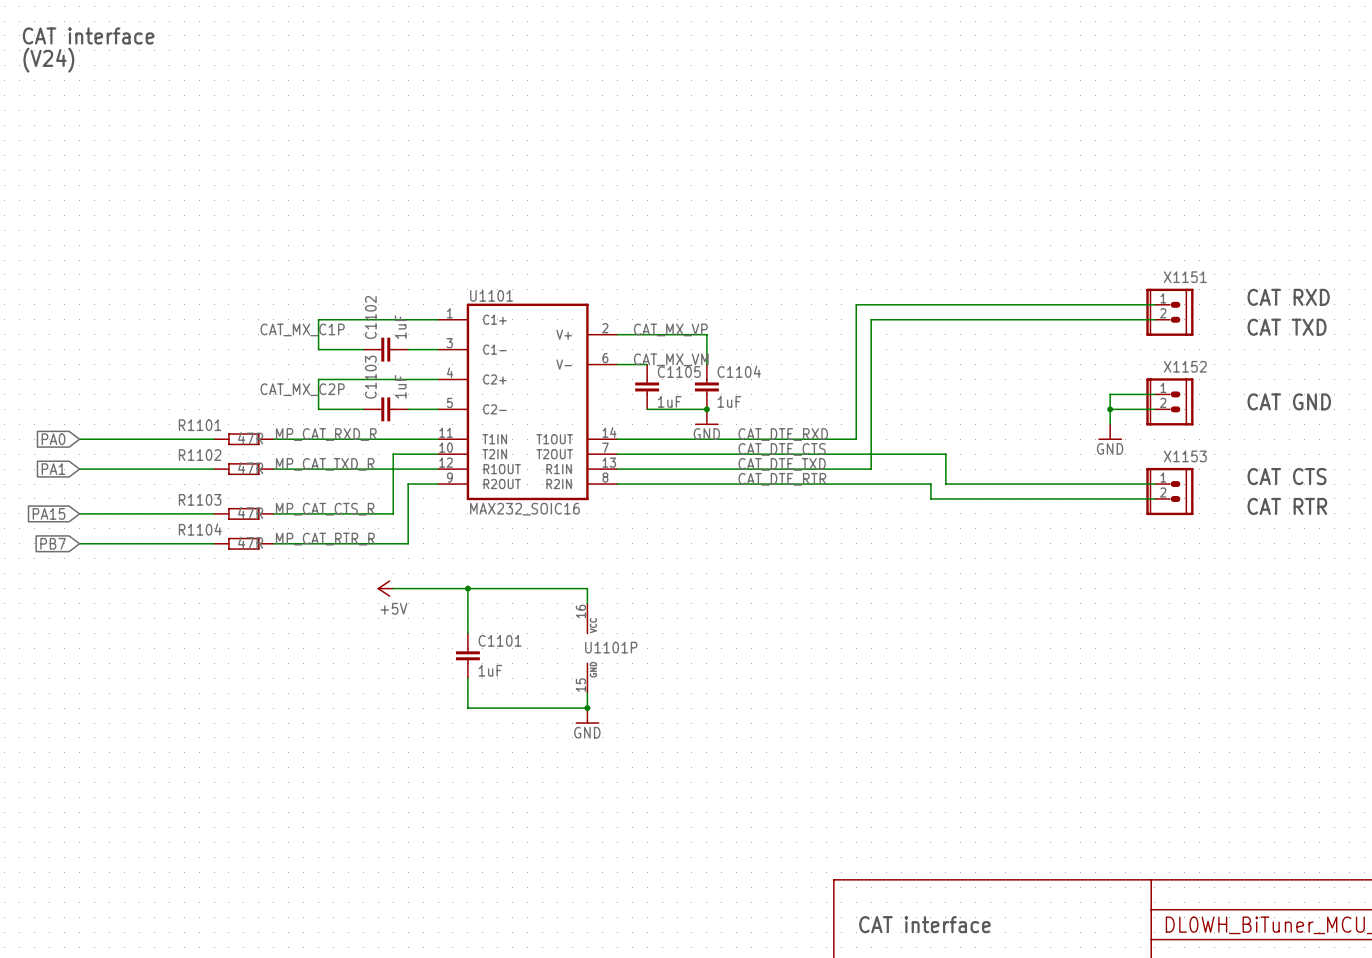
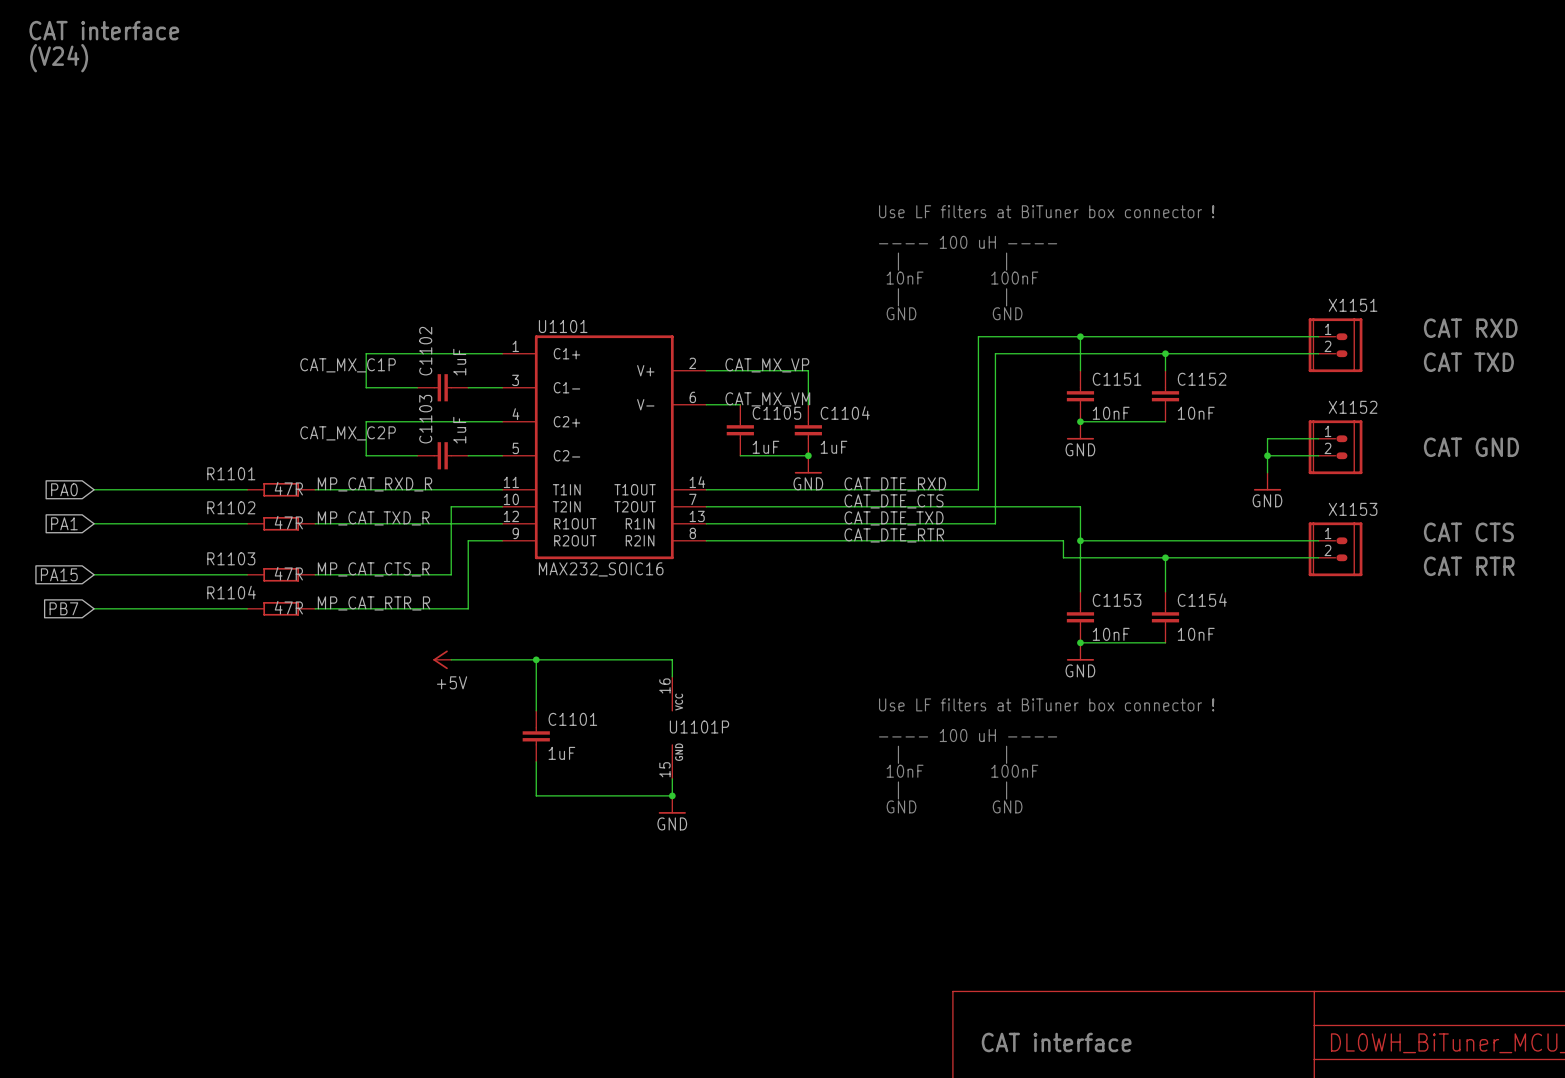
text: none -> Use LF filters at BiTuner box connector ! (1046, 211)
text: none -> ---- 100 uH ---- (968, 242)
text: none -> | | (952, 261)
text: none -> 10nF 100nF (962, 278)
text: none -> | | (952, 297)
text: none -> GND GND (954, 313)
wire: none -> (1080, 336) (1080, 370)
junction: none -> (1080, 336)
wire: none -> (1165, 353) (1165, 370)
junction: none -> (1165, 353)
C1151: none -> 10nF (1080, 396)
C1152: none -> 10nF (1165, 396)
wire: none -> (1080, 421) (1165, 421)
junction: none -> (1080, 421)
power symbol: none -> GND (1080, 430)
wire: none -> (1080, 540) (1080, 591)
junction: none -> (1080, 540)
wire: none -> (1165, 557) (1165, 591)
junction: none -> (1165, 557)
C1153: none -> 10nF (1080, 617)
C1154: none -> 10nF (1165, 617)
wire: none -> (1080, 642) (1165, 642)
junction: none -> (1080, 642)
power symbol: none -> GND (1080, 651)
text: none -> Use LF filters at BiTuner box connector ! (1046, 704)
text: none -> ---- 100 uH ---- (968, 735)
text: none -> | | (952, 754)
text: none -> 10nF 100nF (962, 771)
text: none -> | | (952, 790)
text: none -> GND GND (954, 806)

